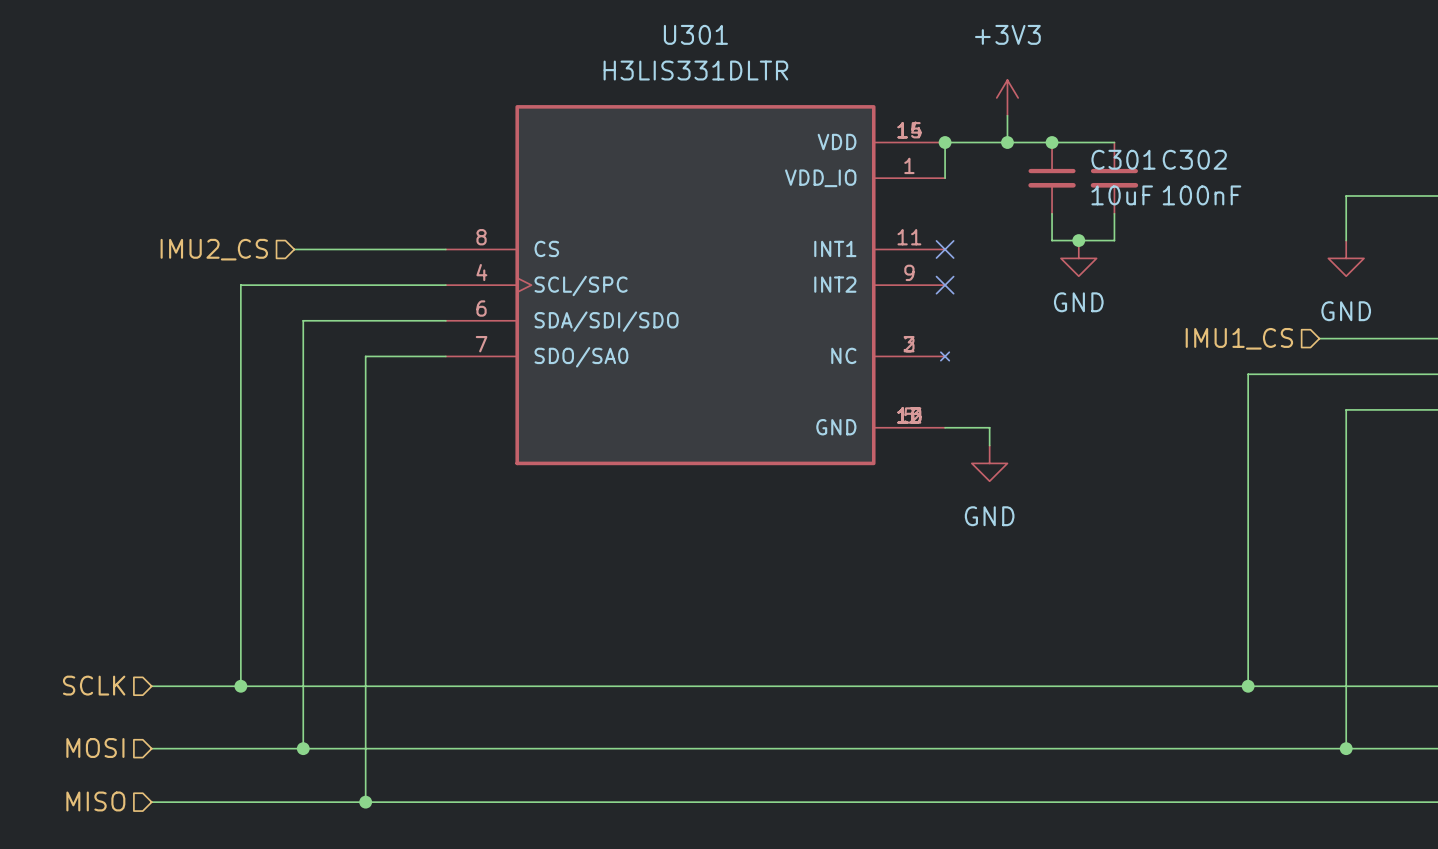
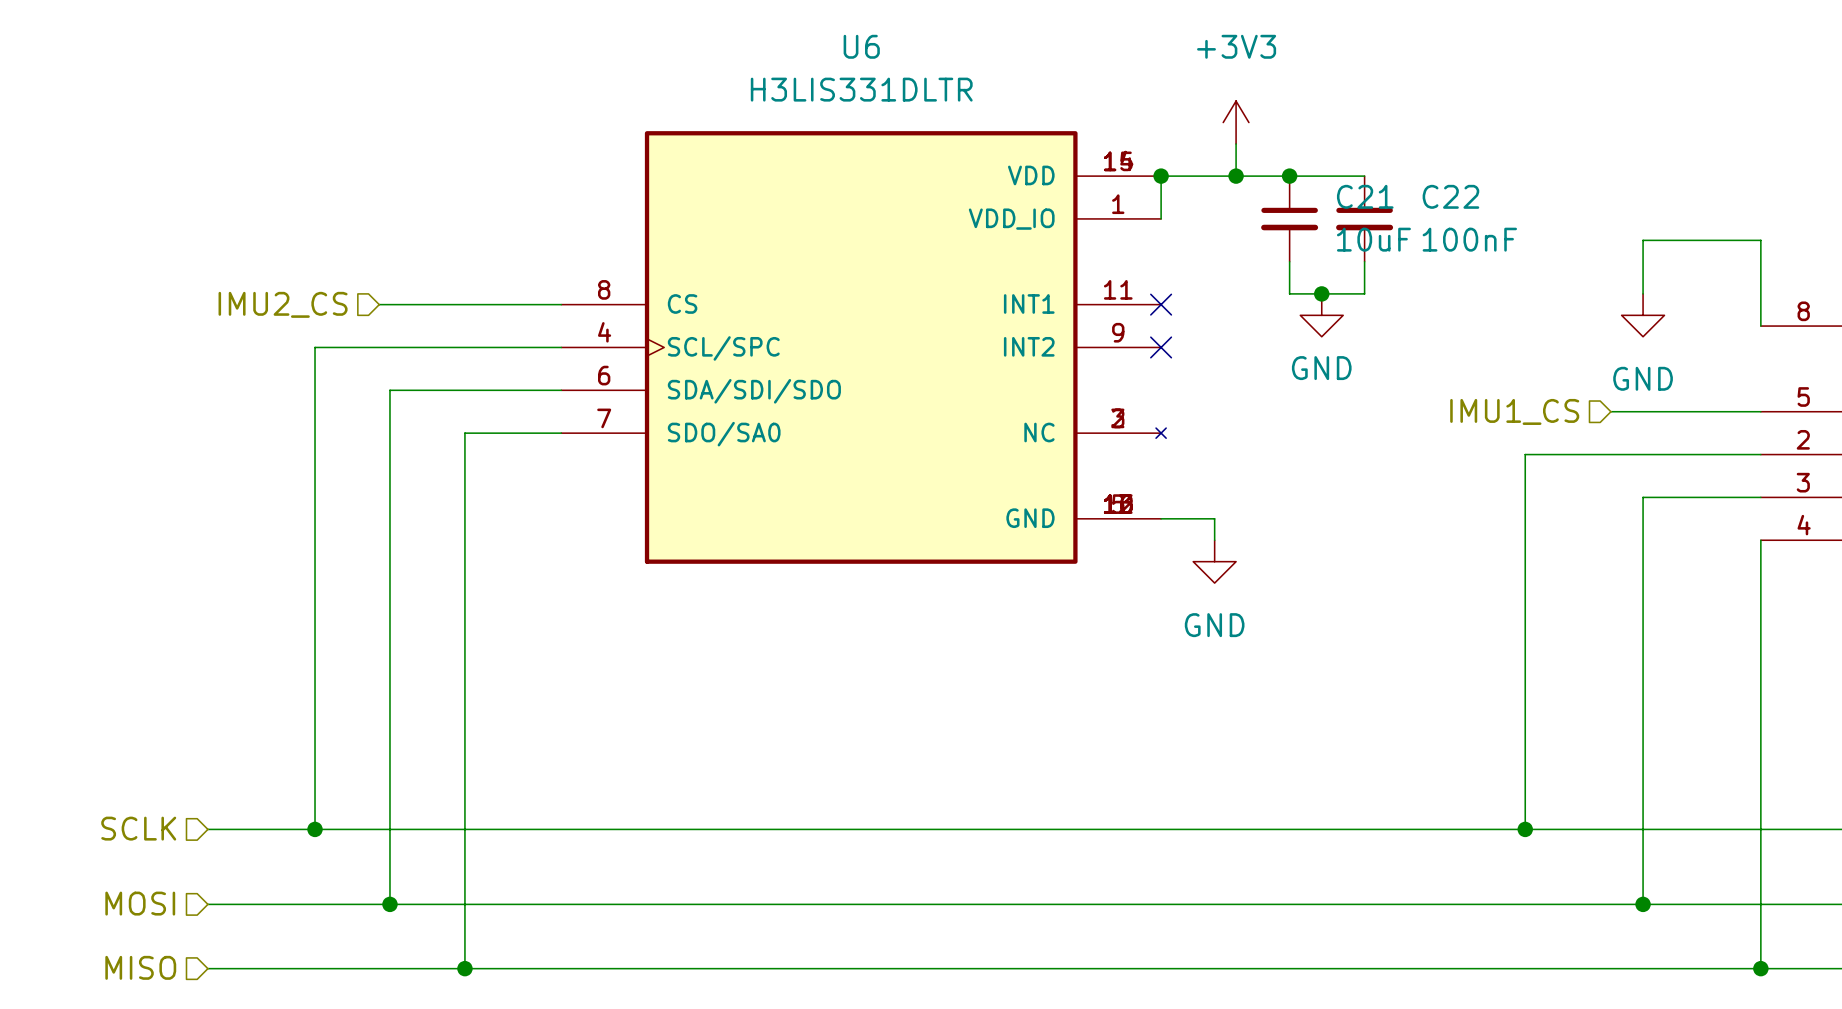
U301 name: U301 (695, 34) -> U6 (861, 46)
C301 name: C301 (1123, 159) -> C21 (1365, 196)
C302 name: C302 (1194, 159) -> C22 (1450, 196)

